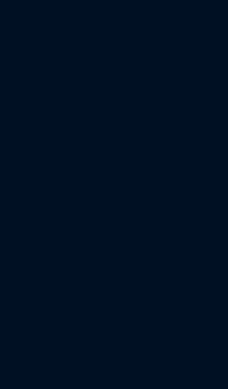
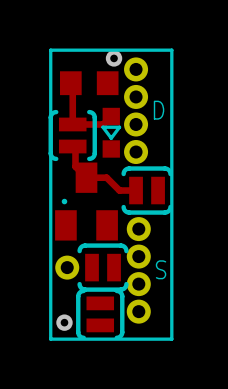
line: none -> (50, 50) (50, 339) (171, 339) (171, 50) (50, 50)
via: none -> (114, 58)
part: none -> (136, 69)
top track: none -> (70, 83) (72, 85) (72, 124) (103, 124) (111, 116)
part: none -> (89, 83)
part: none -> (136, 96)
text: none -> D (159, 110)
part: none -> (136, 124)
part: none -> (111, 132)
part: none -> (72, 135)
top track: none -> (75, 146) (75, 166) (86, 177) (106, 177) (119, 190) (136, 190)
part: none -> (136, 152)
part: none -> (147, 190)
part: none -> (86, 201)
part: none -> (138, 229)
part: none -> (138, 256)
part: none -> (67, 267)
part: none -> (103, 267)
text: none -> S (161, 269)
part: none -> (138, 284)
part: none -> (138, 311)
part: none -> (100, 314)
via: none -> (64, 322)

